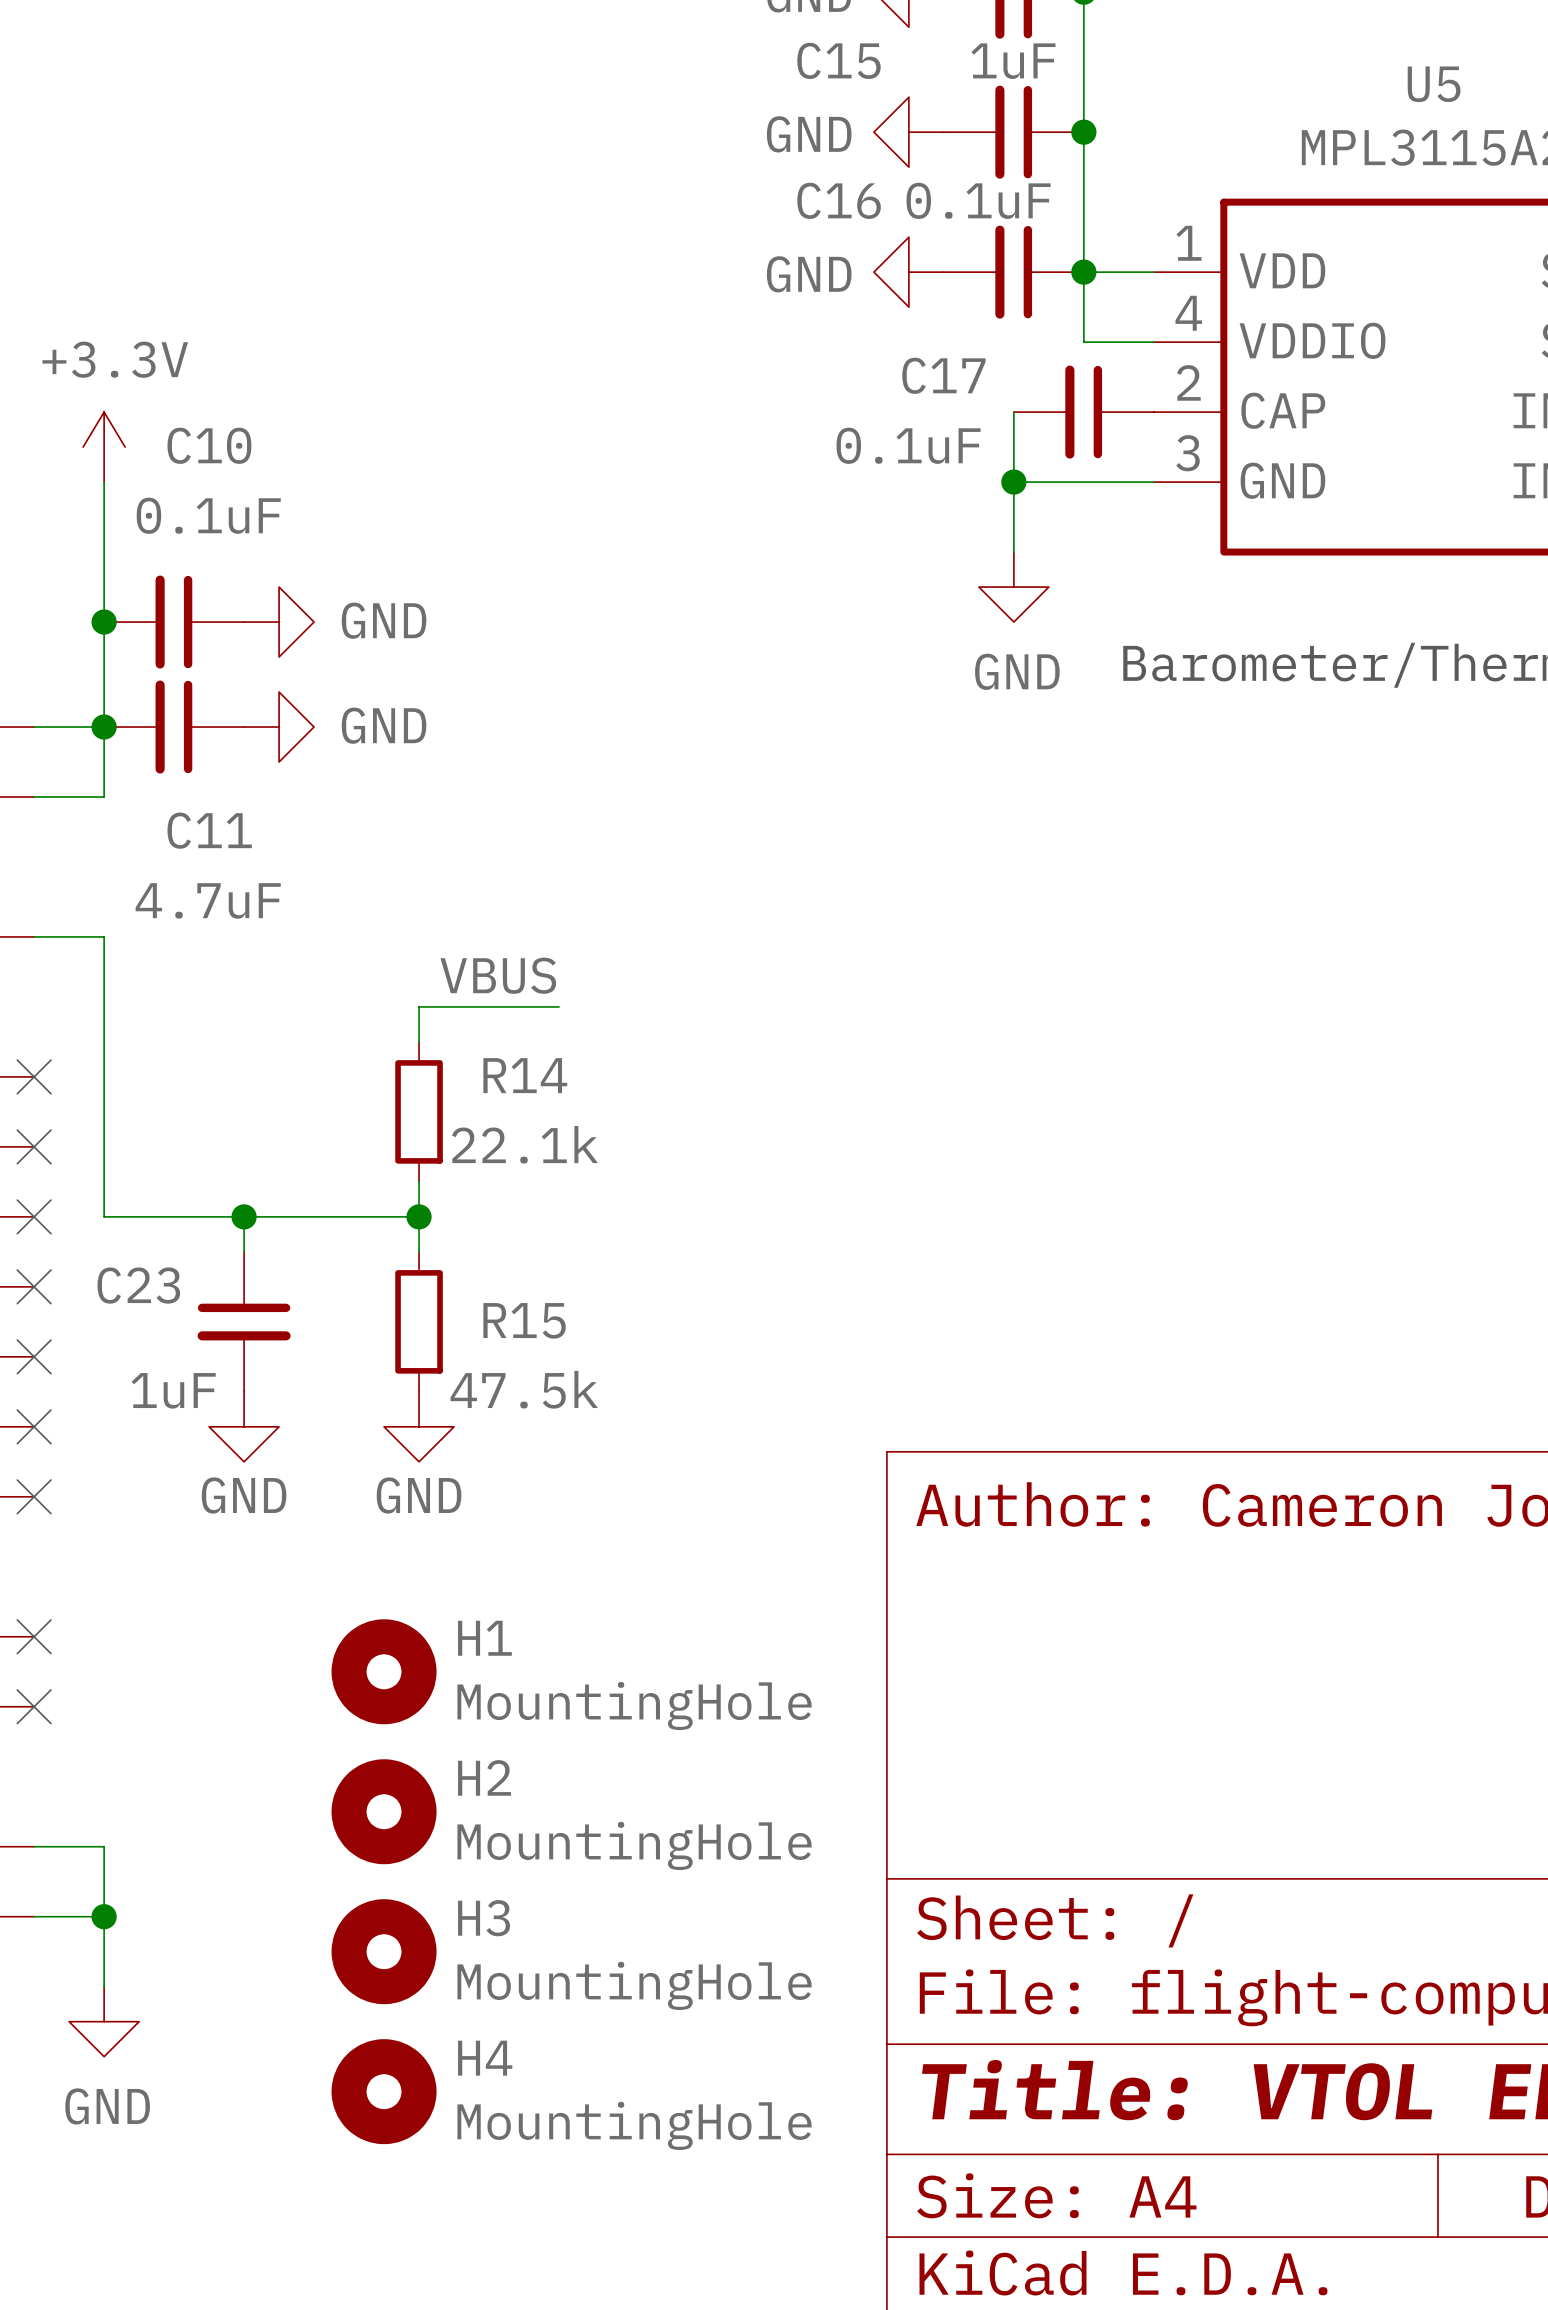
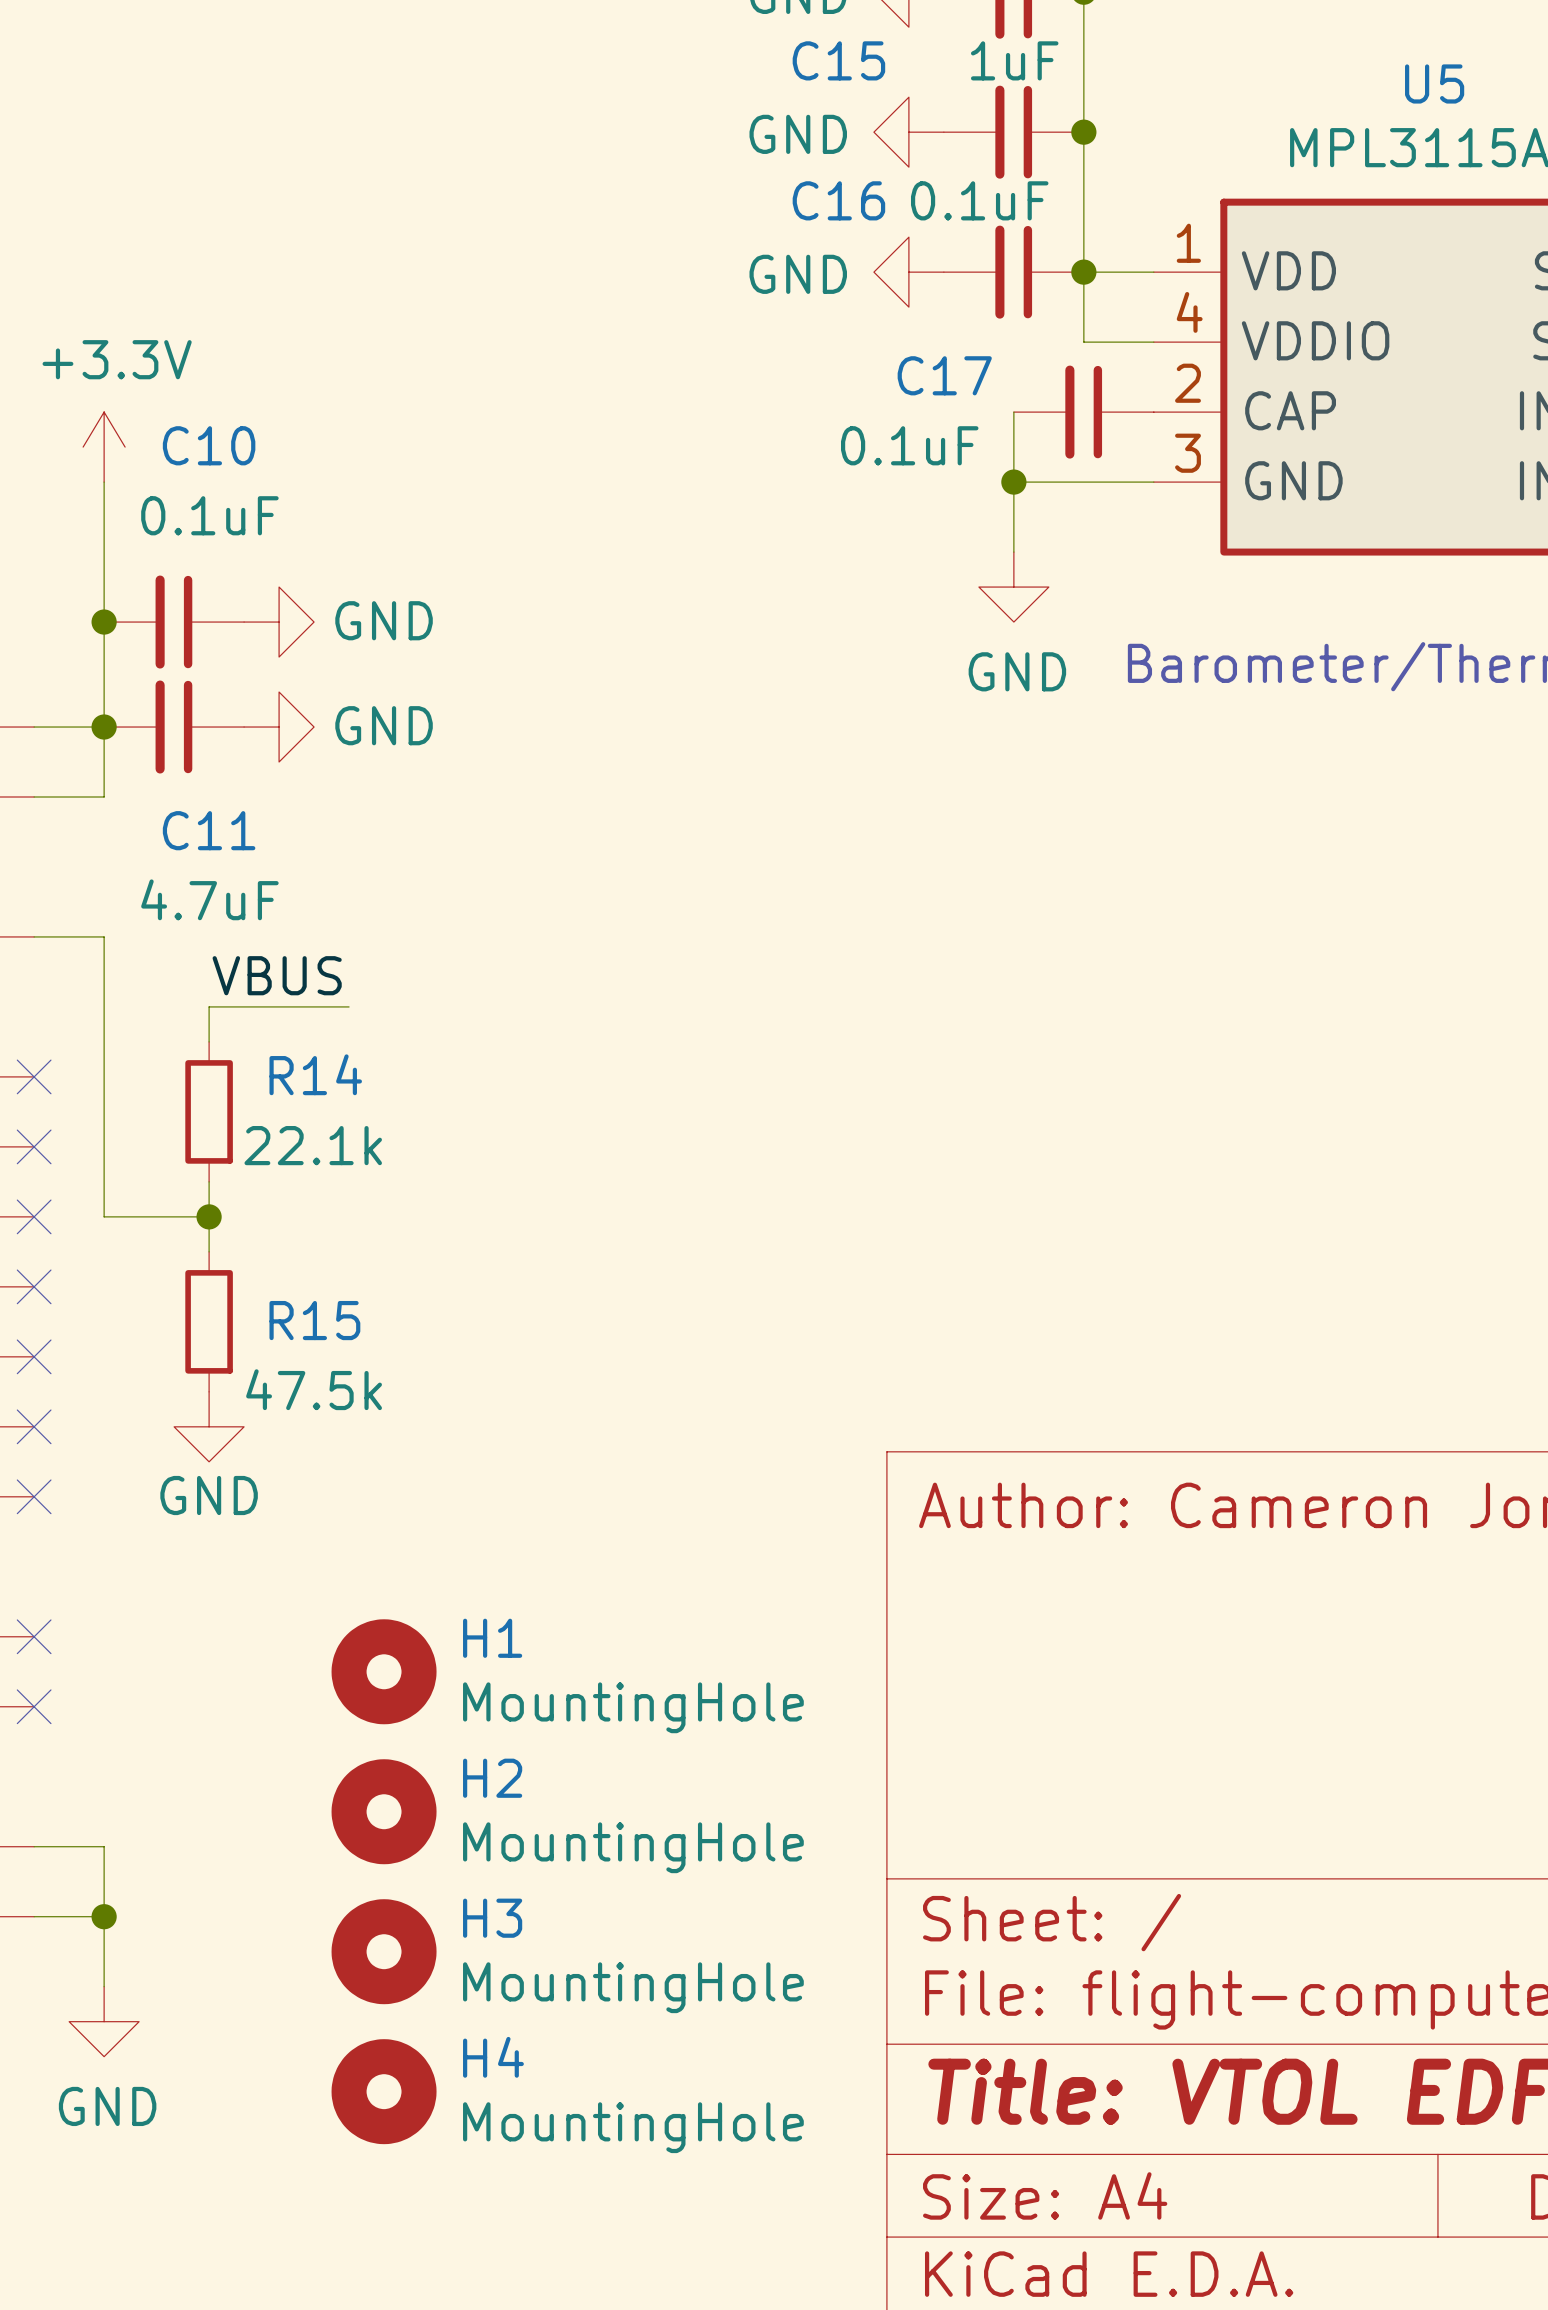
label position: VBUS (498, 975) -> VBUS (277, 975)
wire: (559, 1006) (419, 1006) (419, 1041) -> (349, 1006) (209, 1006) (209, 1041)
R14 position: (419, 1111) -> (209, 1111)
wire: (419, 1181) (419, 1251) -> (209, 1181) (209, 1251)
wire: (209, 1216) (419, 1216) -> none
wire: (244, 1216) (244, 1251) -> none
junction position: (244, 1216) -> (209, 1216)
junction: (419, 1216) -> none
C23: 1uF (244, 1321) -> none
R15 position: (419, 1321) -> (209, 1321)
power symbol position: GND (244, 1426) -> GND (209, 1426)
power symbol: GND (419, 1426) -> none

